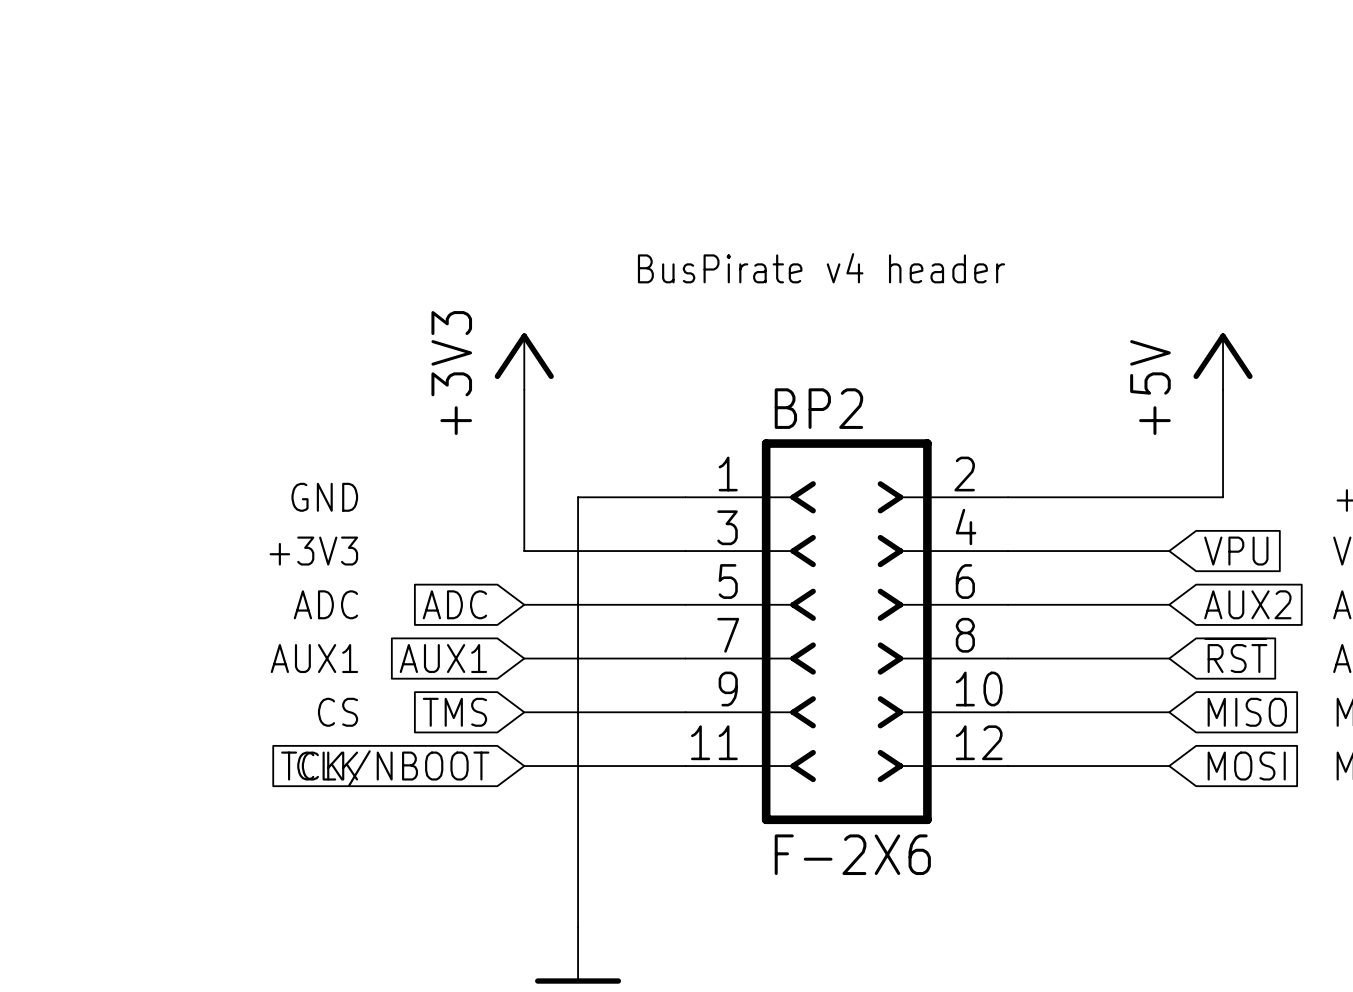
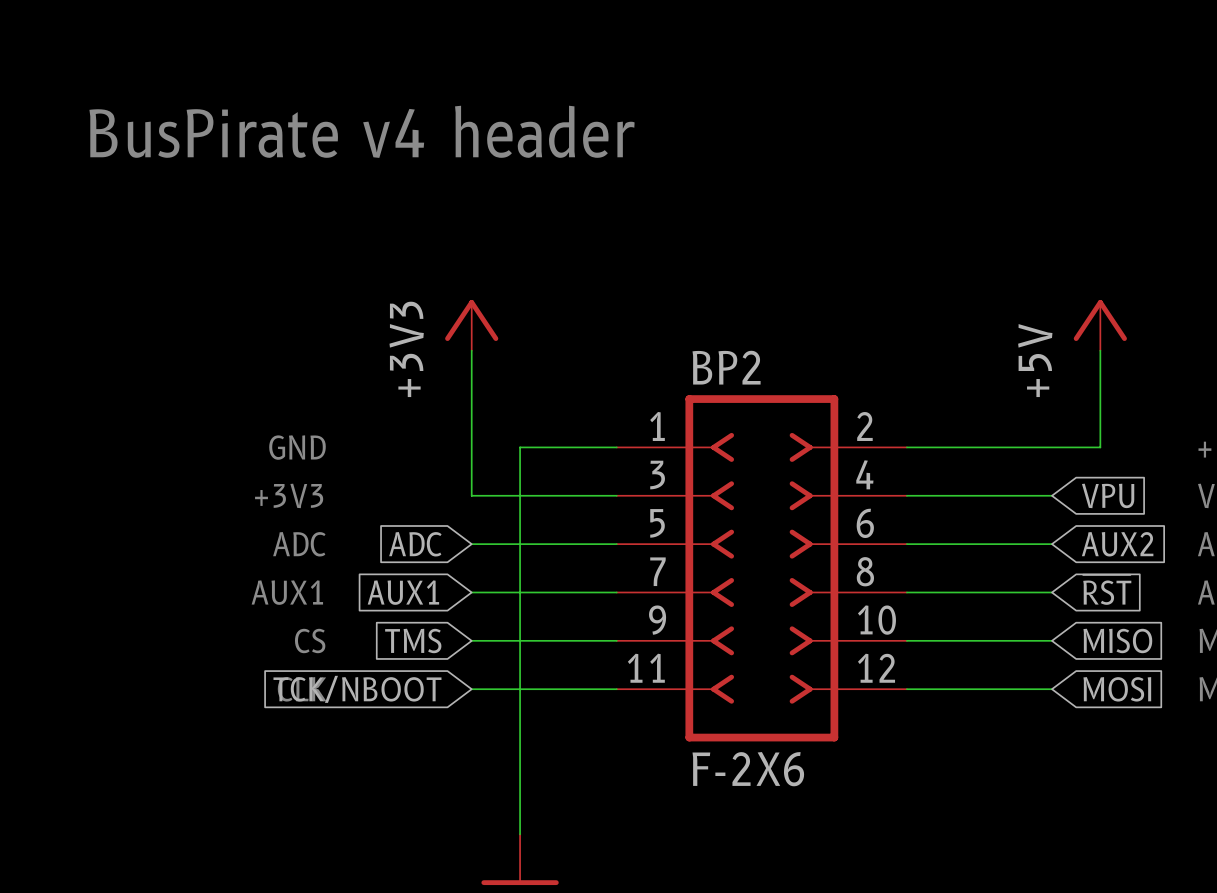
text: none -> BusPirate v4 header (362, 131)
text: BusPirate v4 header (821, 268) -> none

